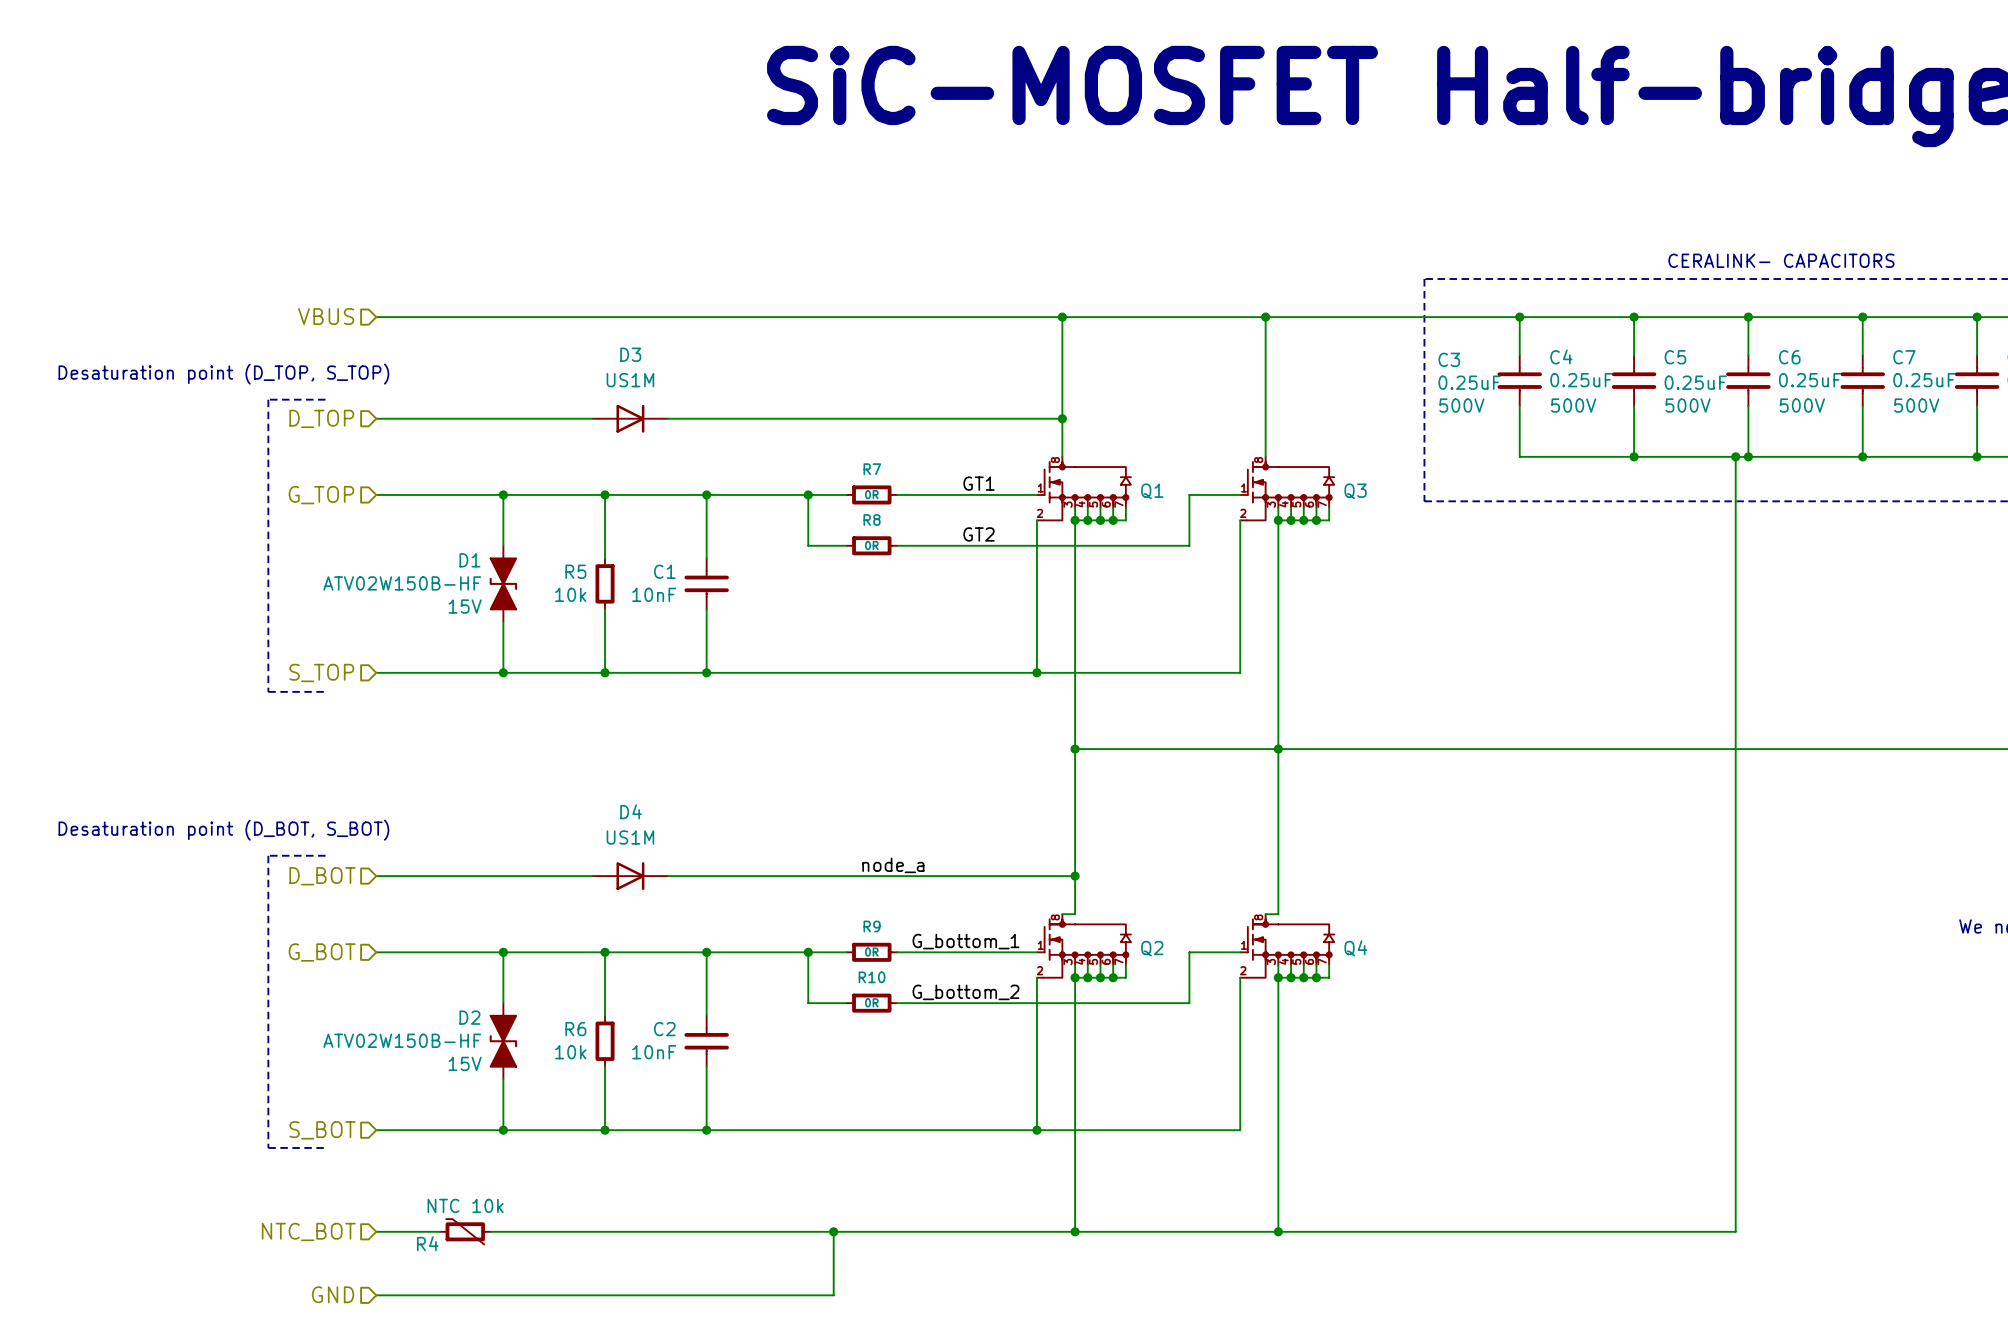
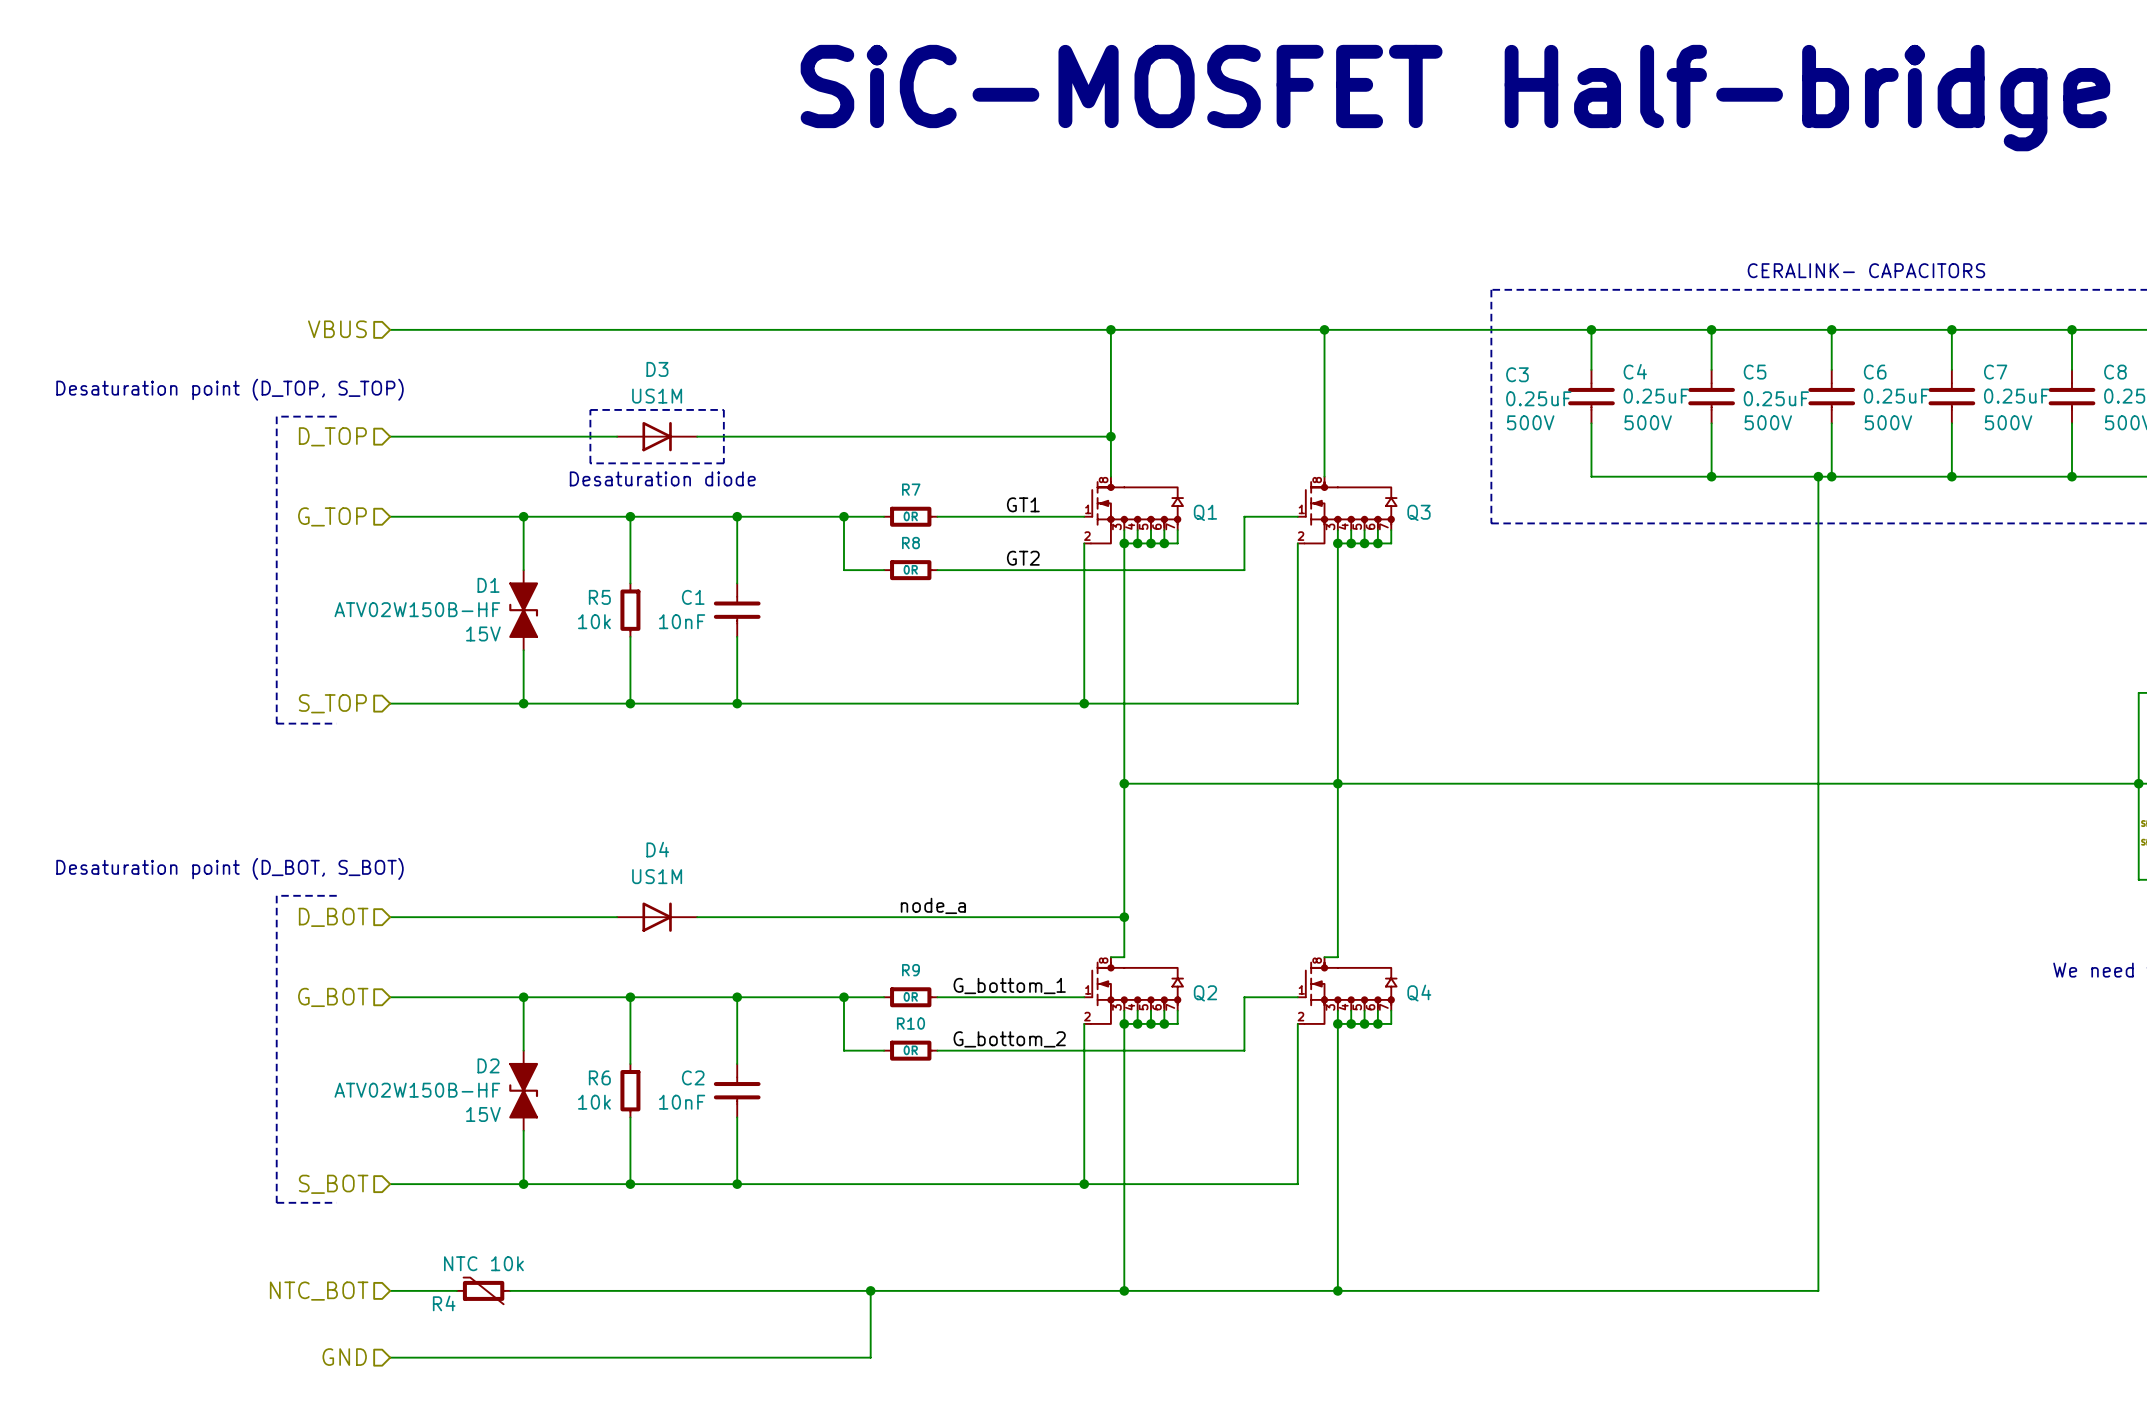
line: none -> (590, 409) (723, 409) (723, 463) (590, 463) (590, 409)
text: none -> Desaturation diode (662, 478)

